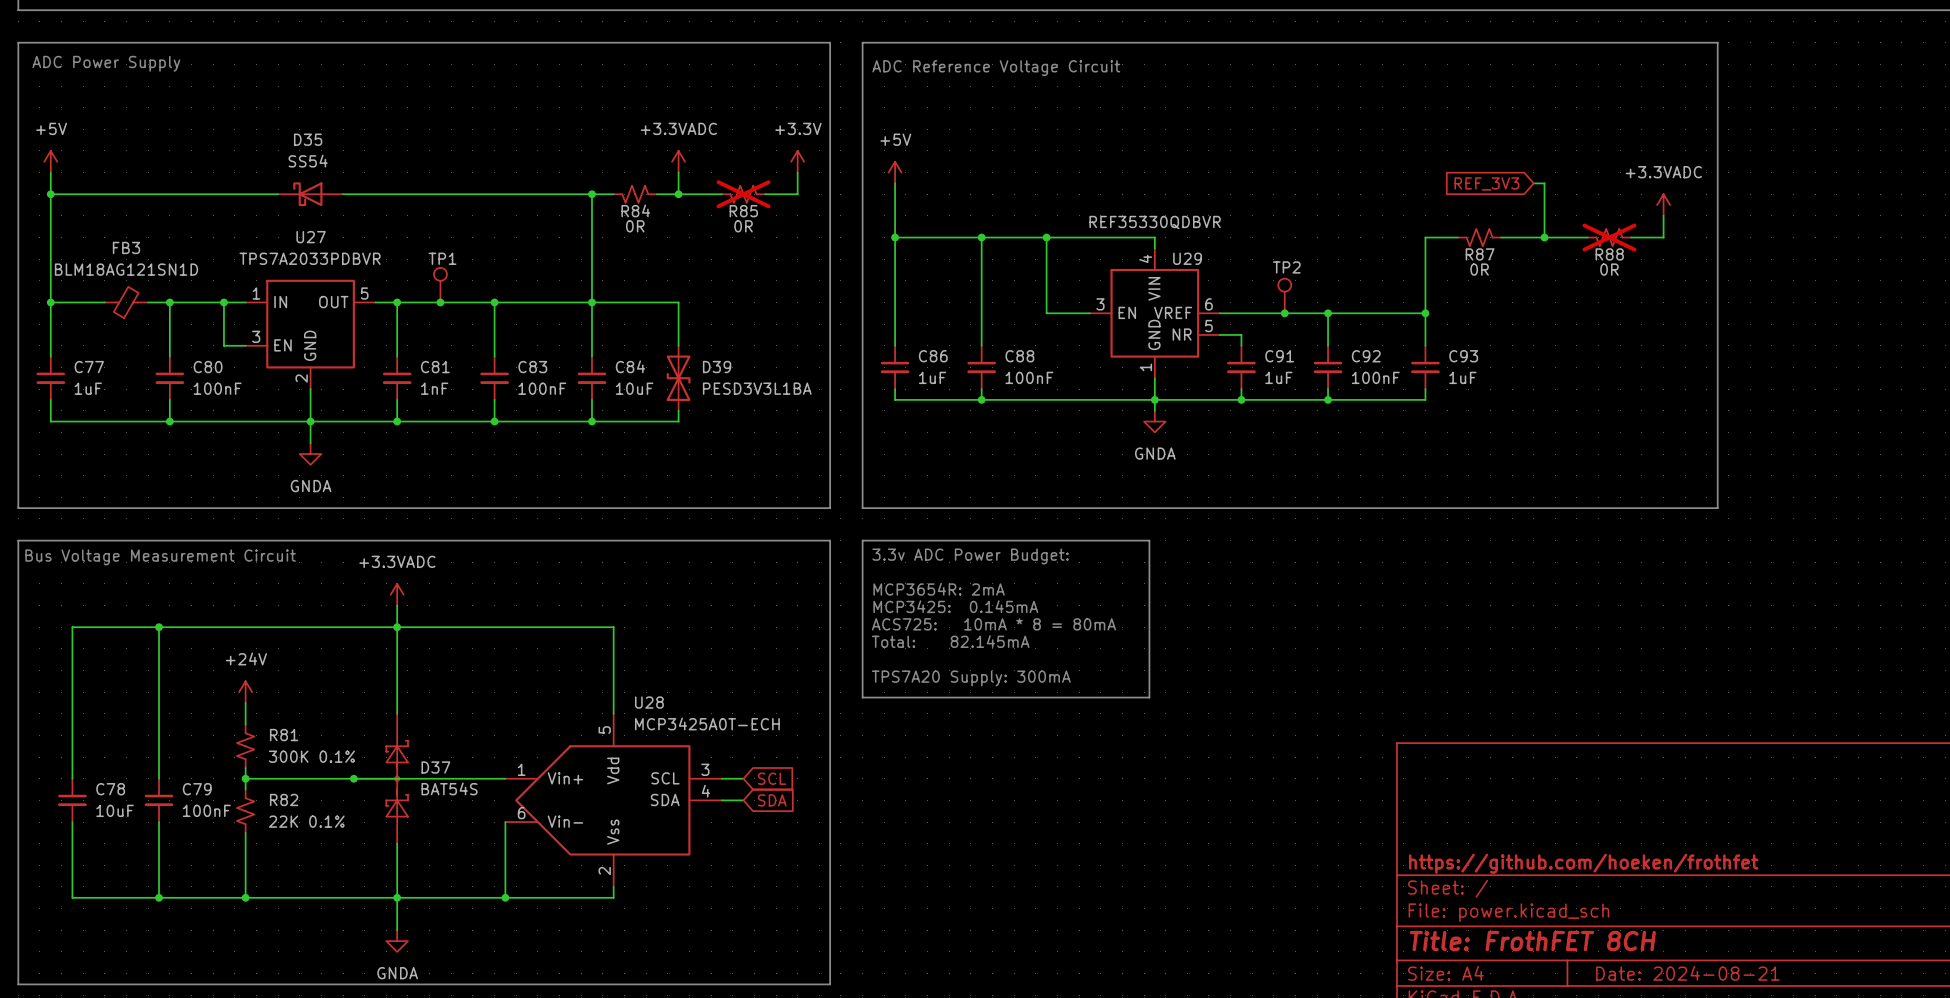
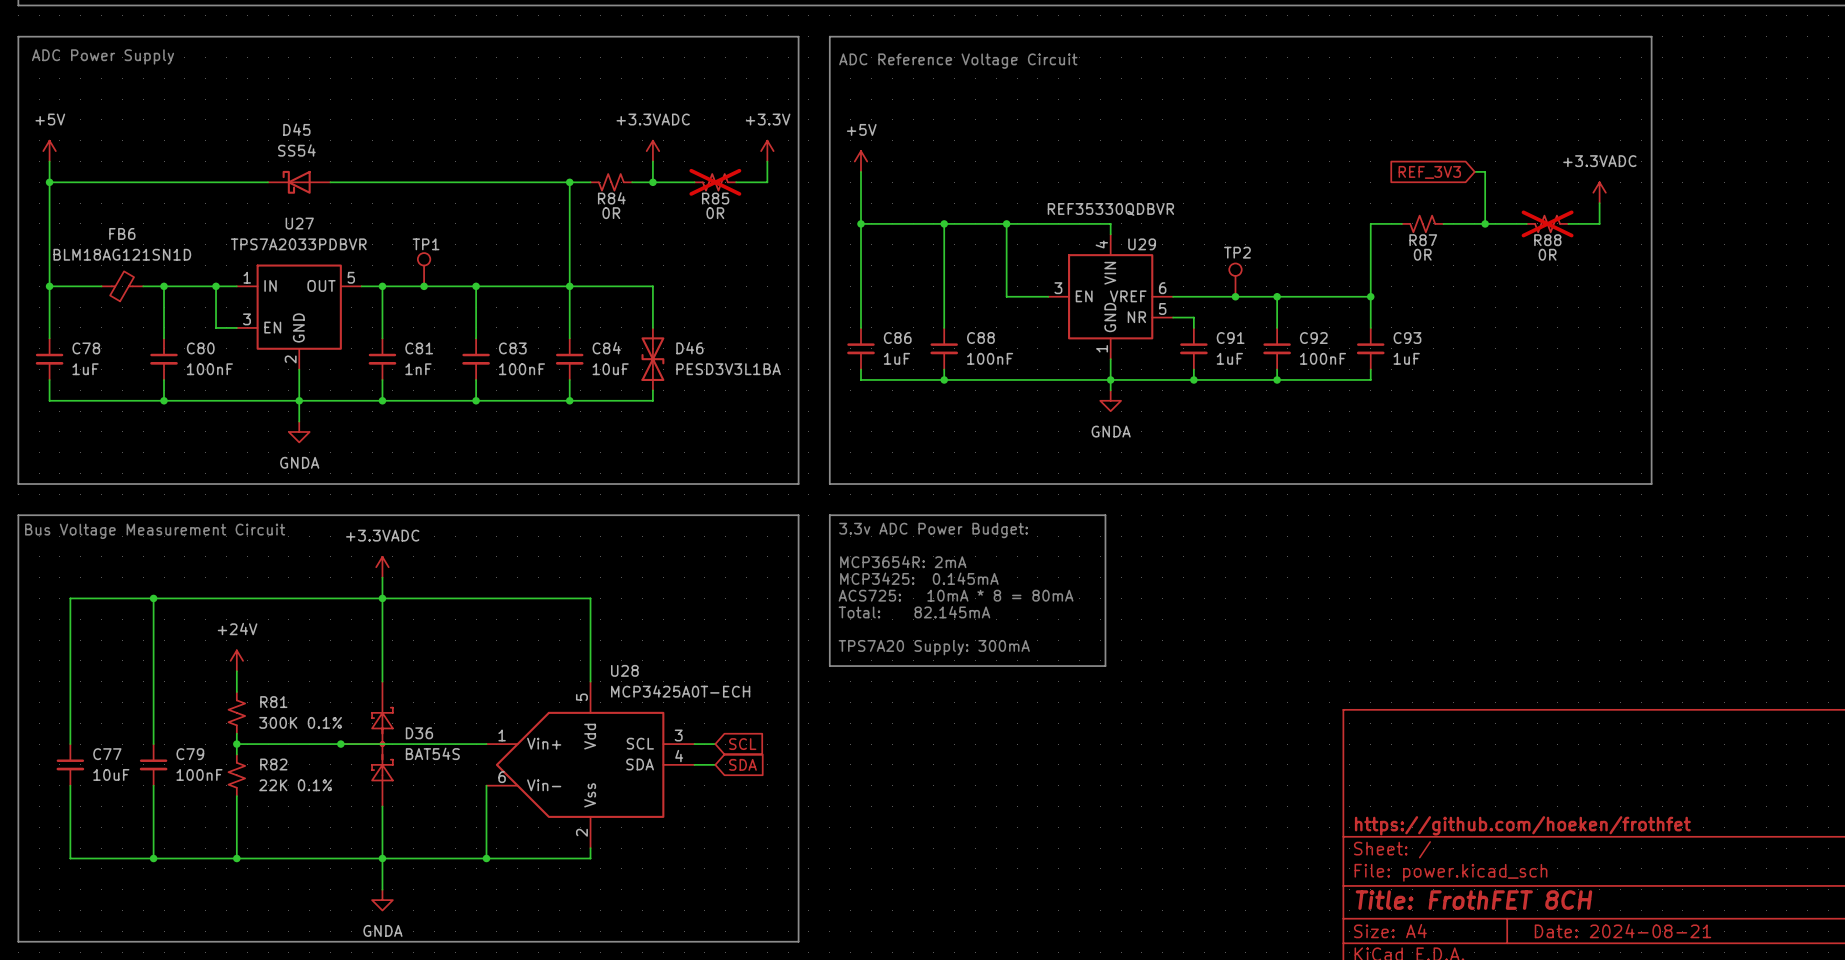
D35 name: D35 (308, 139) -> D45 (296, 129)
FB3 name: FB3 (126, 247) -> FB6 (122, 233)
C77 name: C77 (89, 367) -> C78 (86, 348)
D39 name: D39 (717, 367) -> D46 (689, 348)
D37 name: D37 (435, 767) -> D36 (419, 733)
C78 name: C78 (110, 789) -> C77 (107, 754)

